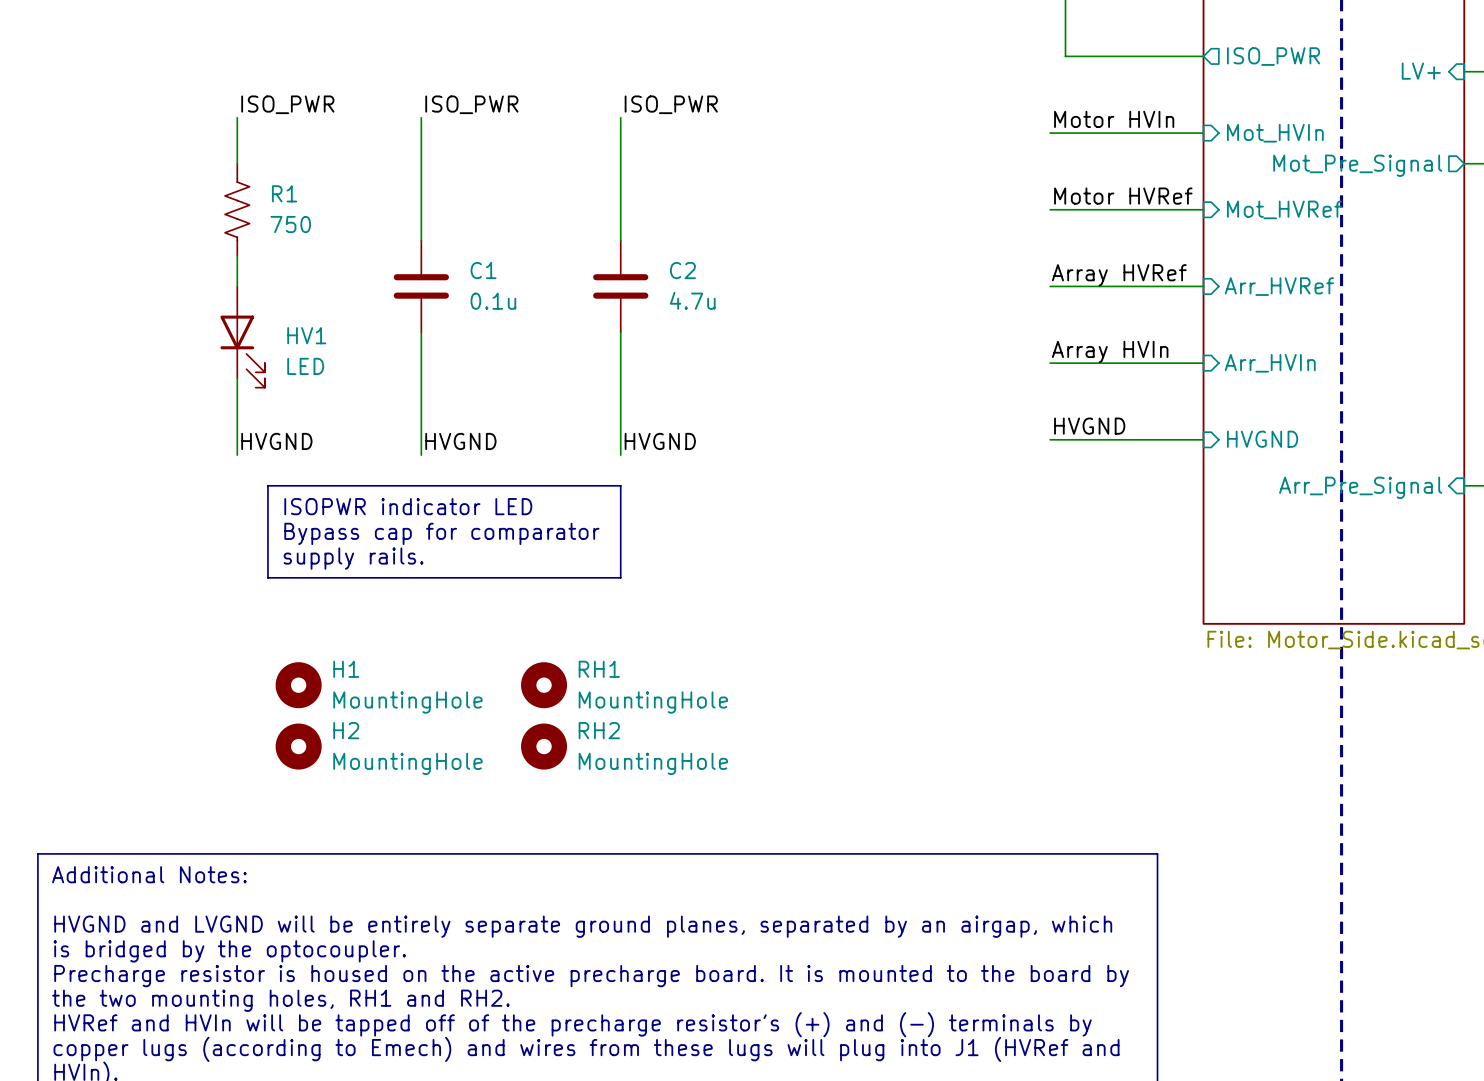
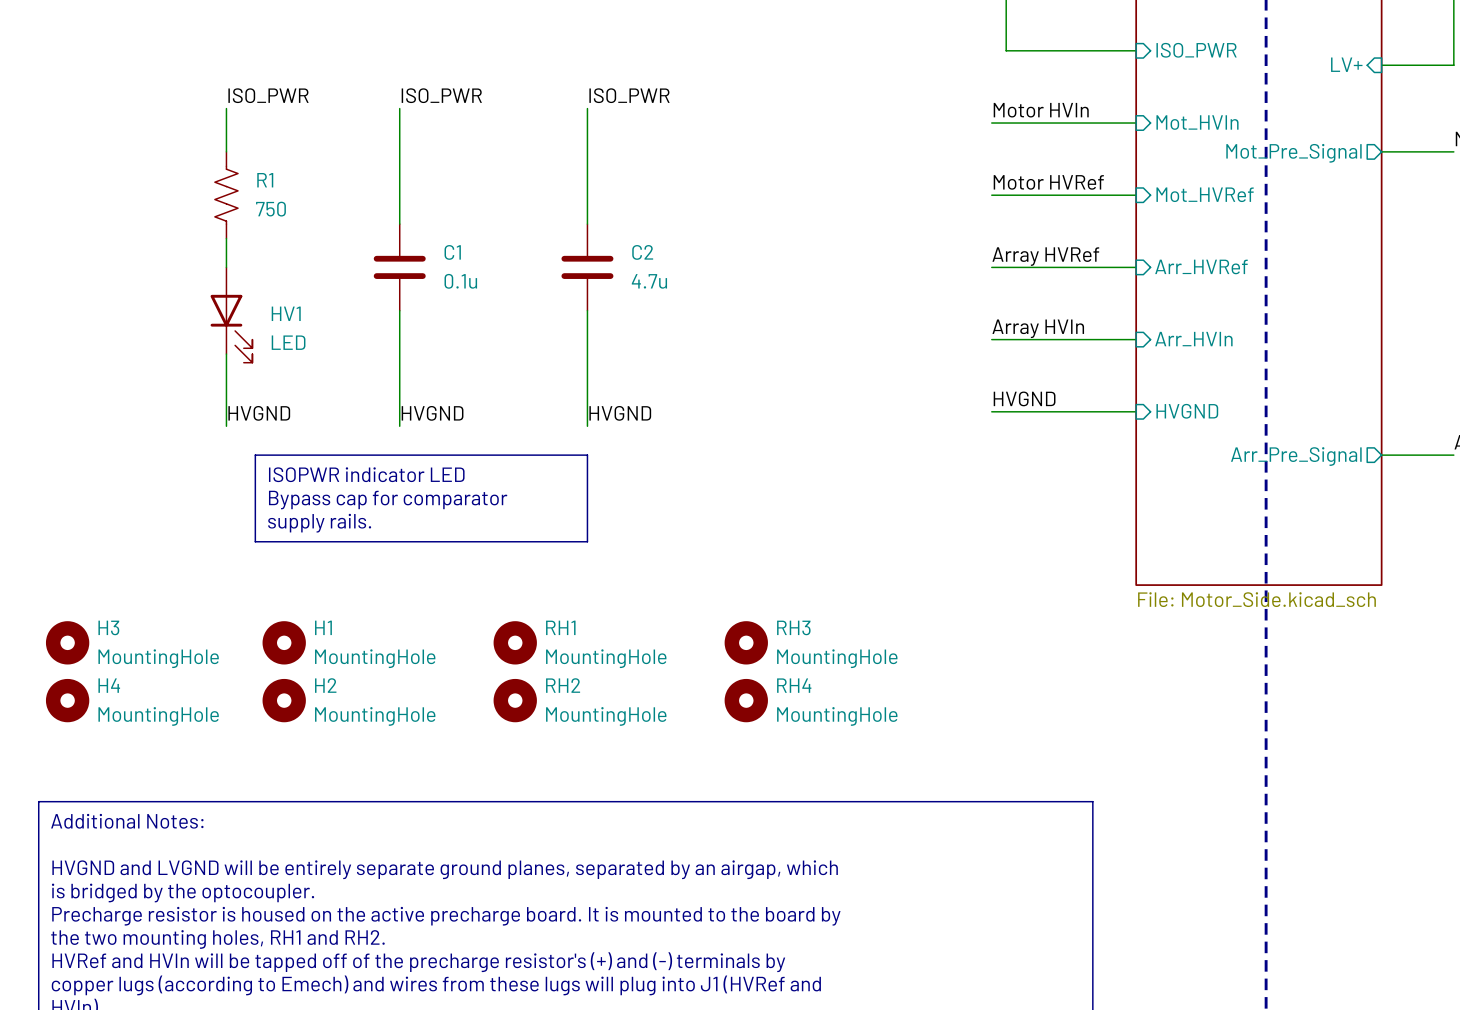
sheet pin shape: output (1273, 56) -> input (1196, 50)
sheet pin shape: input (1360, 487) -> output (1296, 456)
H3: none -> MountingHole (67, 642)
RH3: none -> MountingHole (746, 642)
H4: none -> MountingHole (67, 700)
RH4: none -> MountingHole (746, 700)

